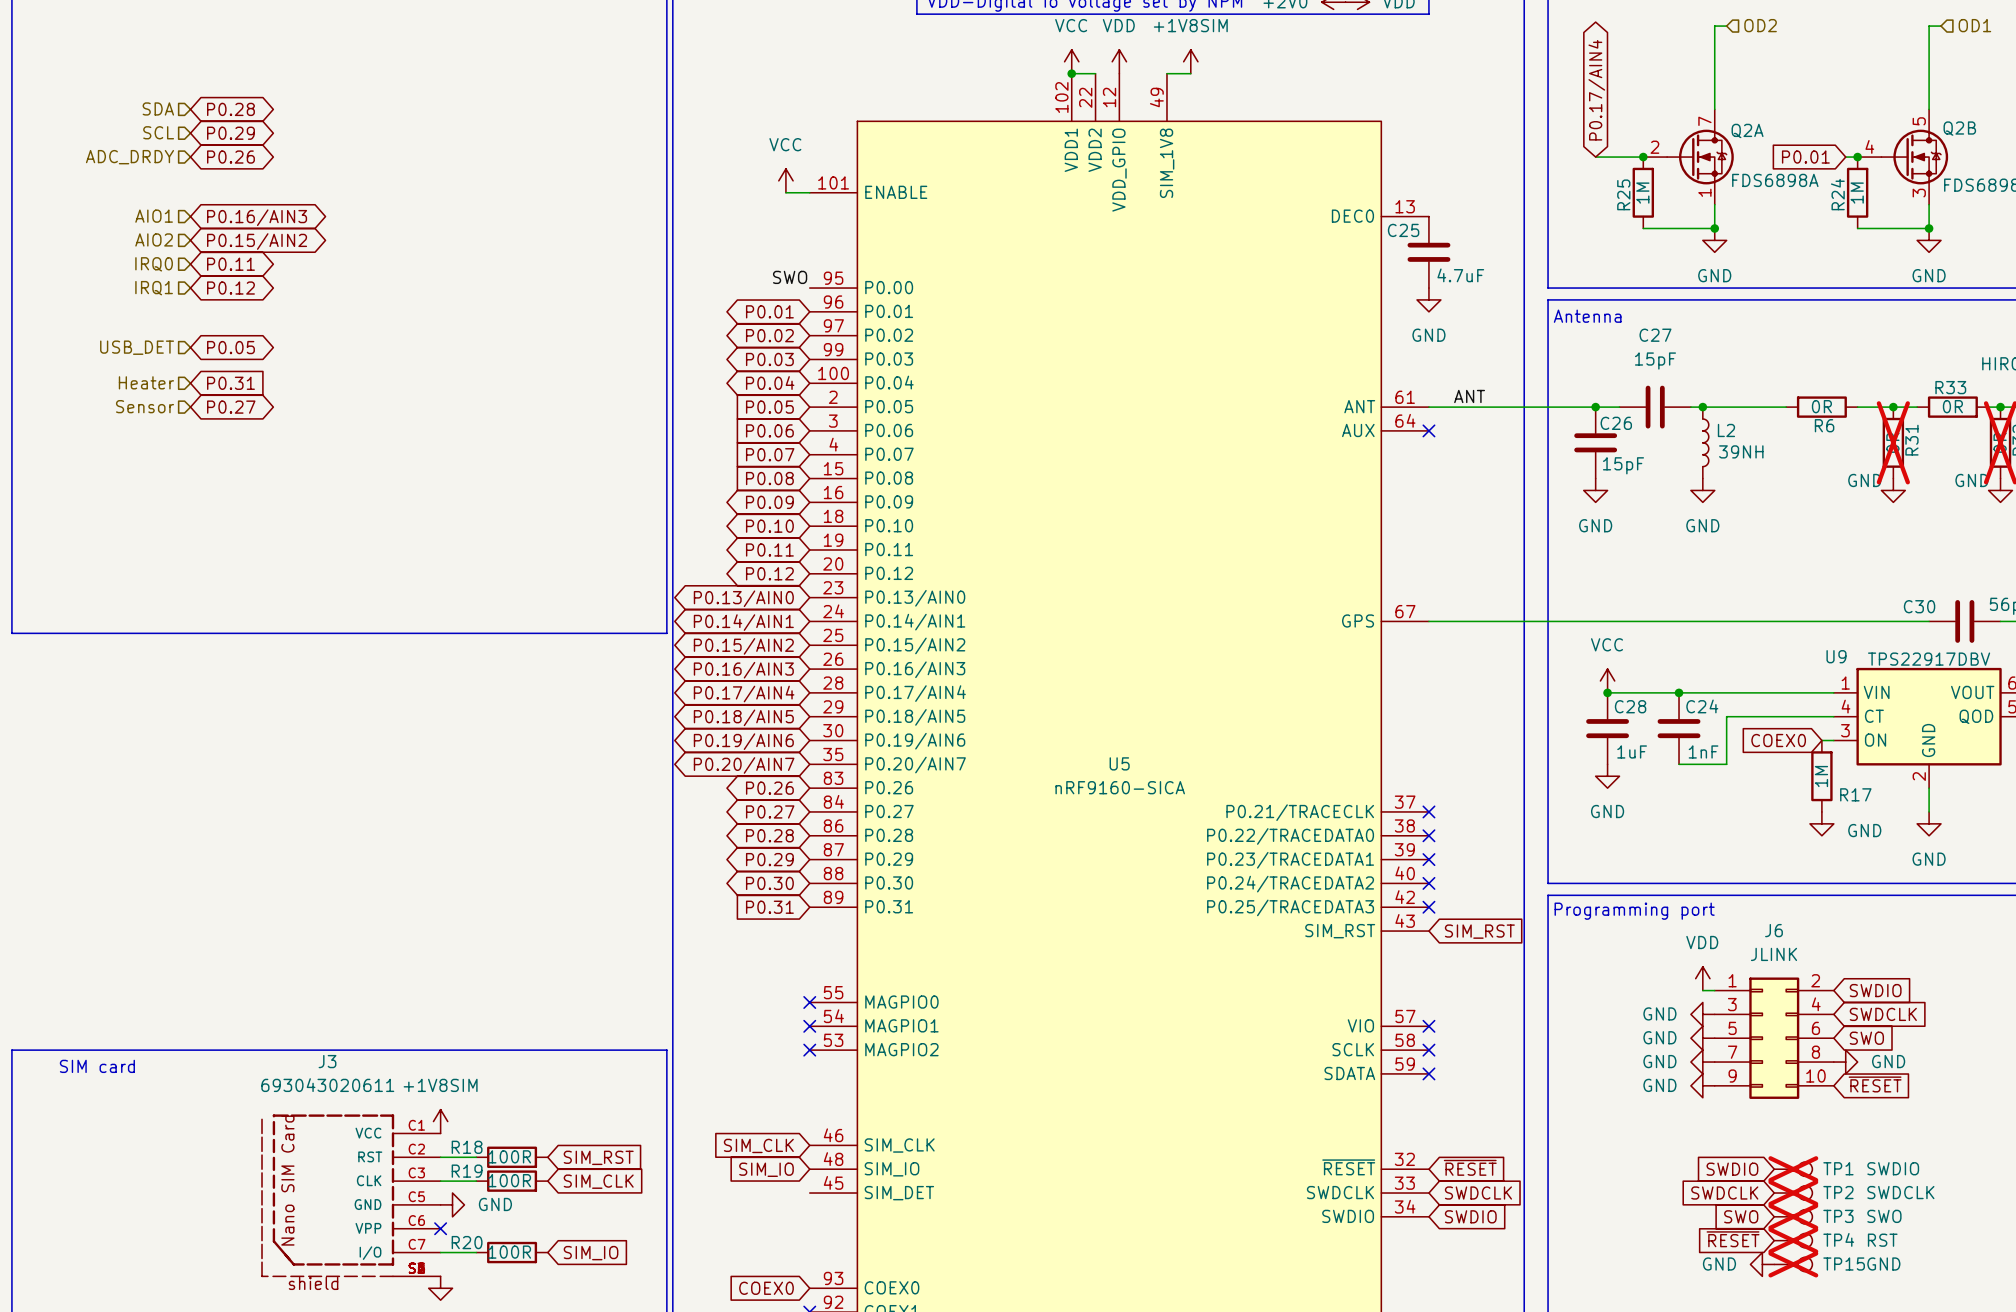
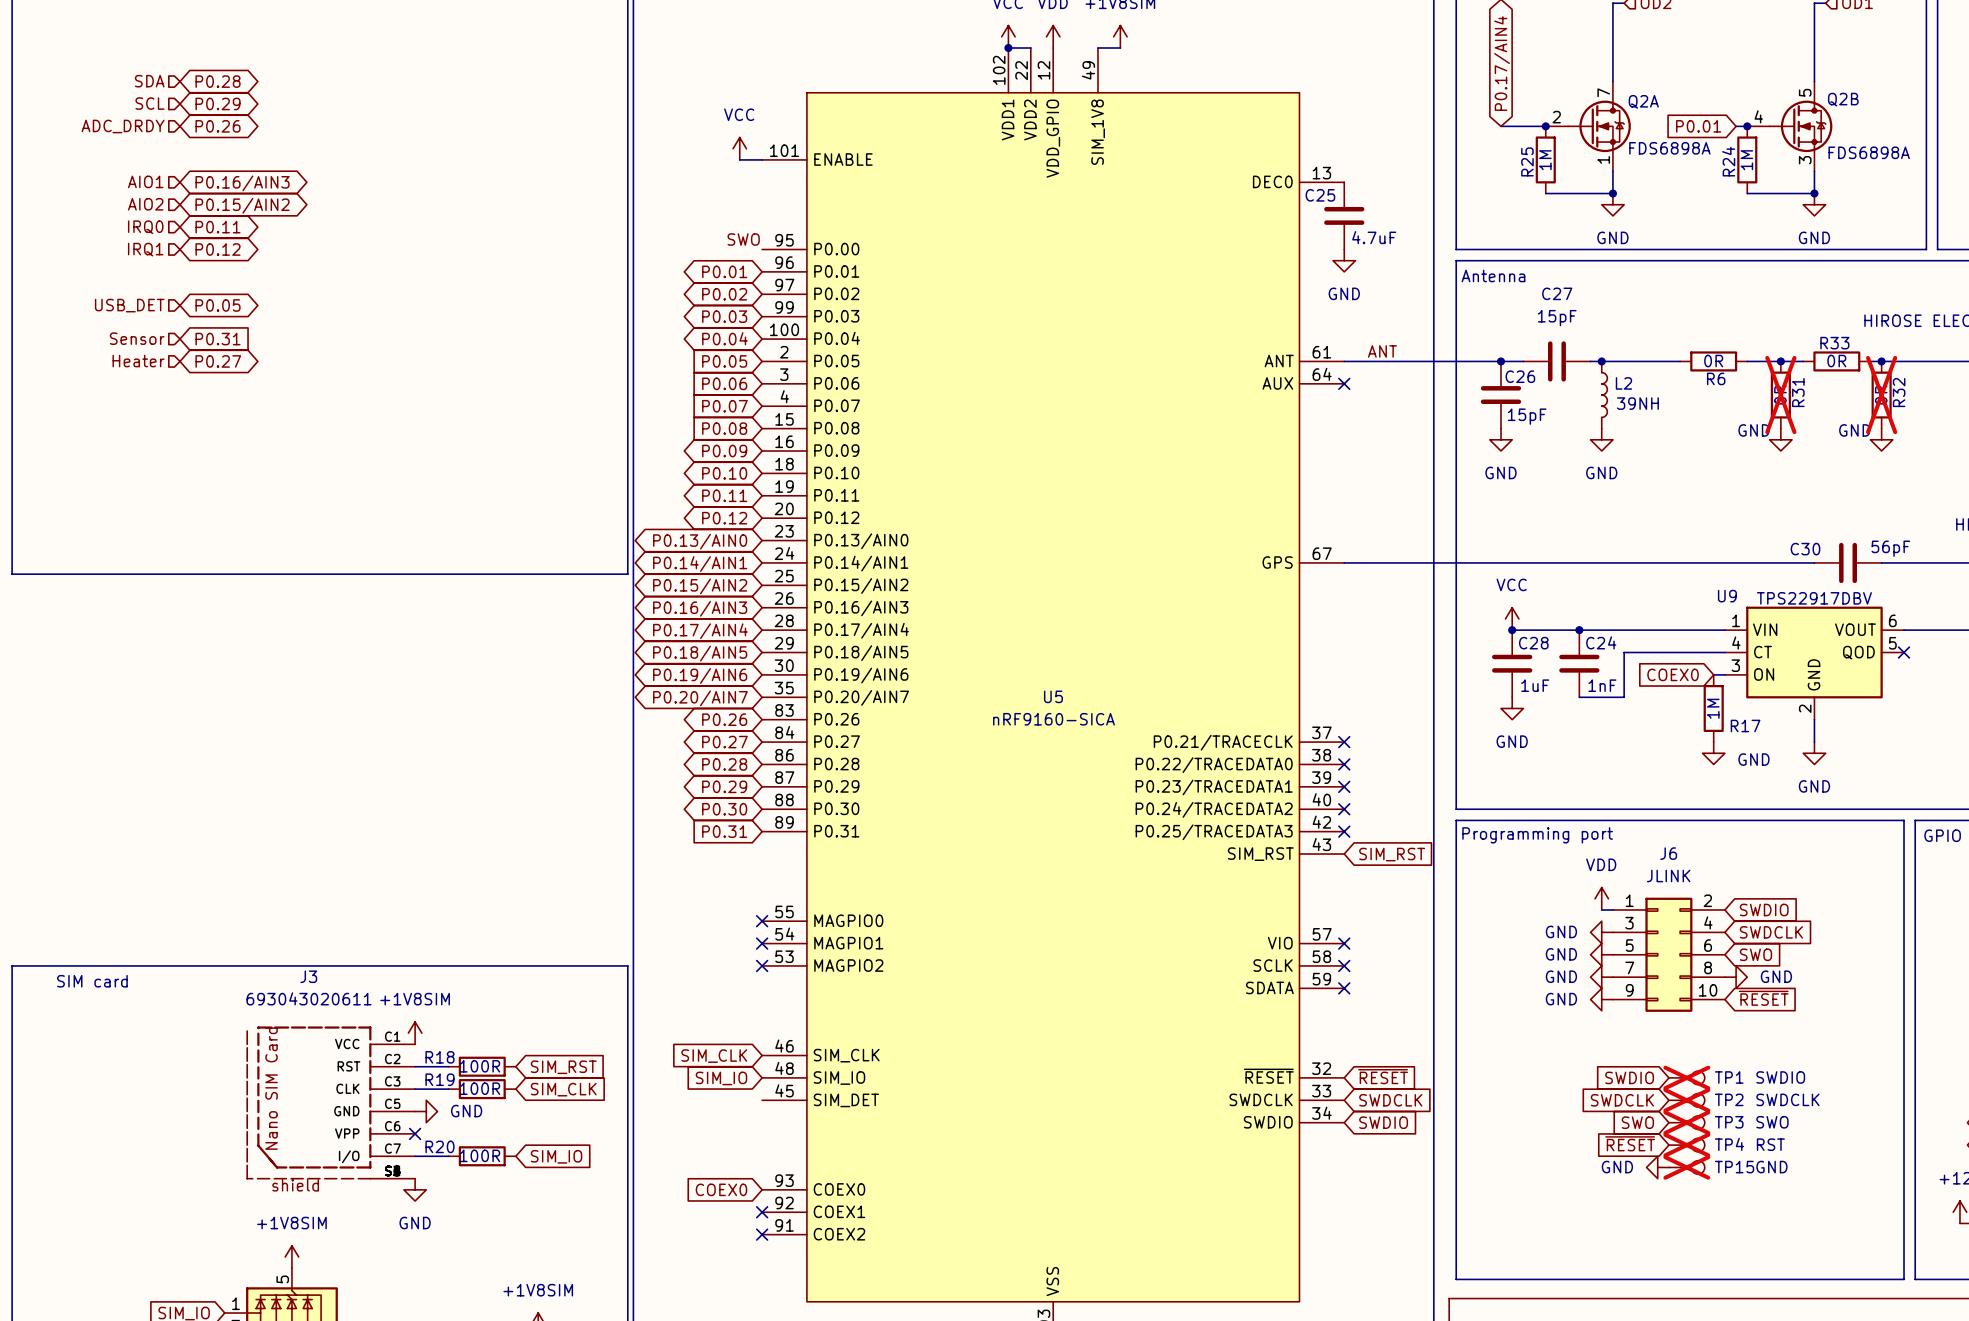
hierarchical label: Heater (146, 382) -> Sensor (137, 338)
hierarchical label: Sensor (145, 406) -> Heater (138, 361)

